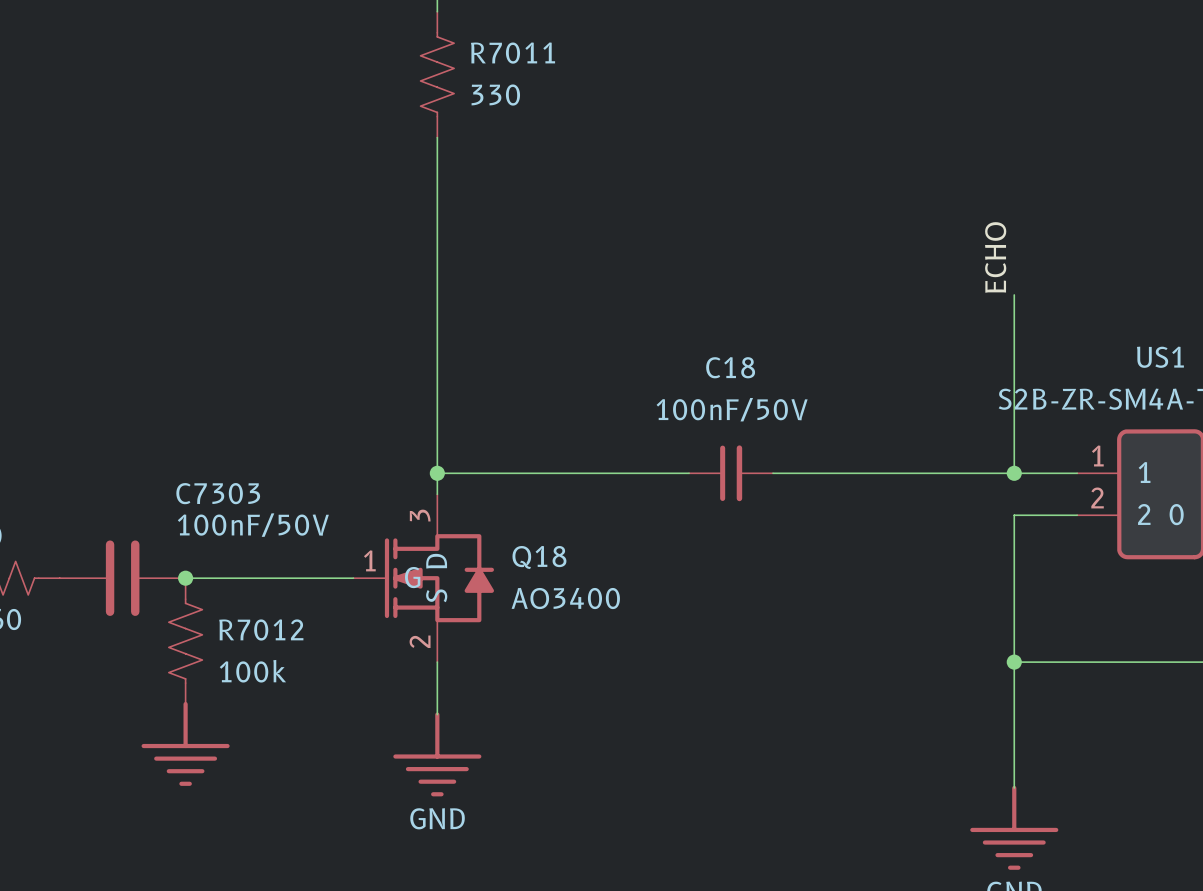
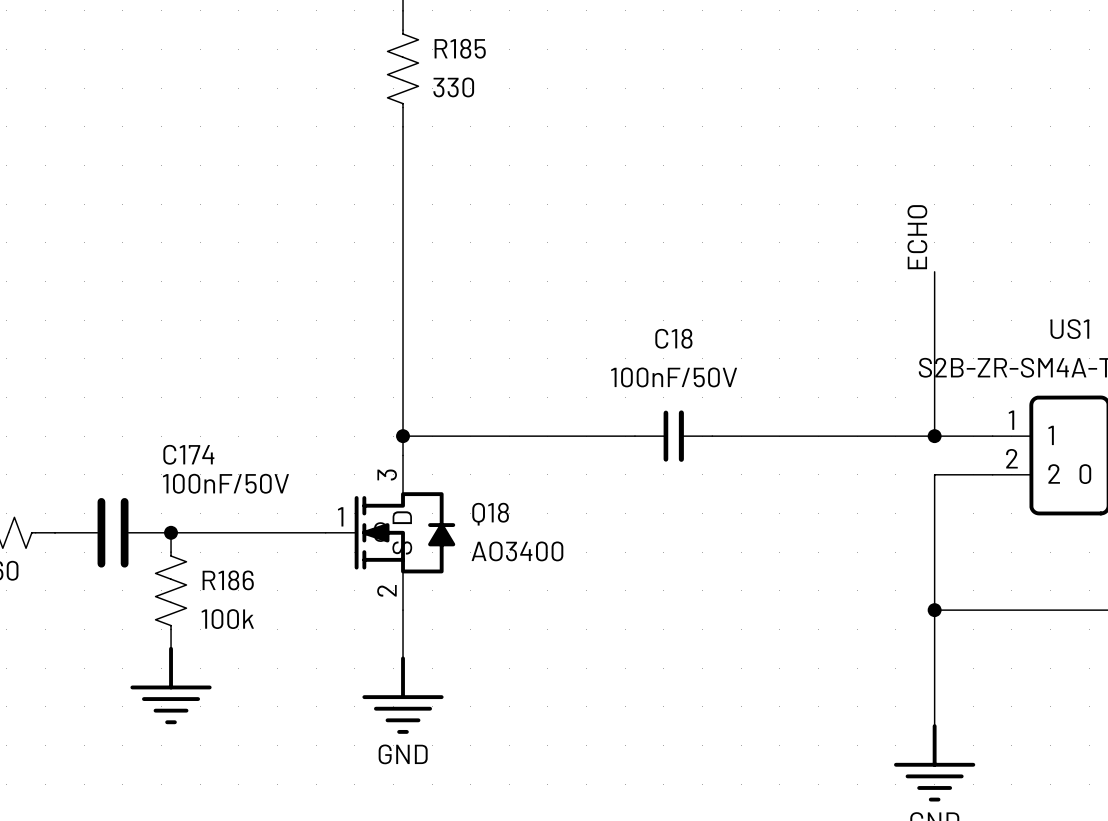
R7011 name: R7011 (513, 53) -> R185 (460, 48)
C7303 name: C7303 (218, 493) -> C174 (188, 454)
R7012 name: R7012 (261, 629) -> R186 (228, 580)

